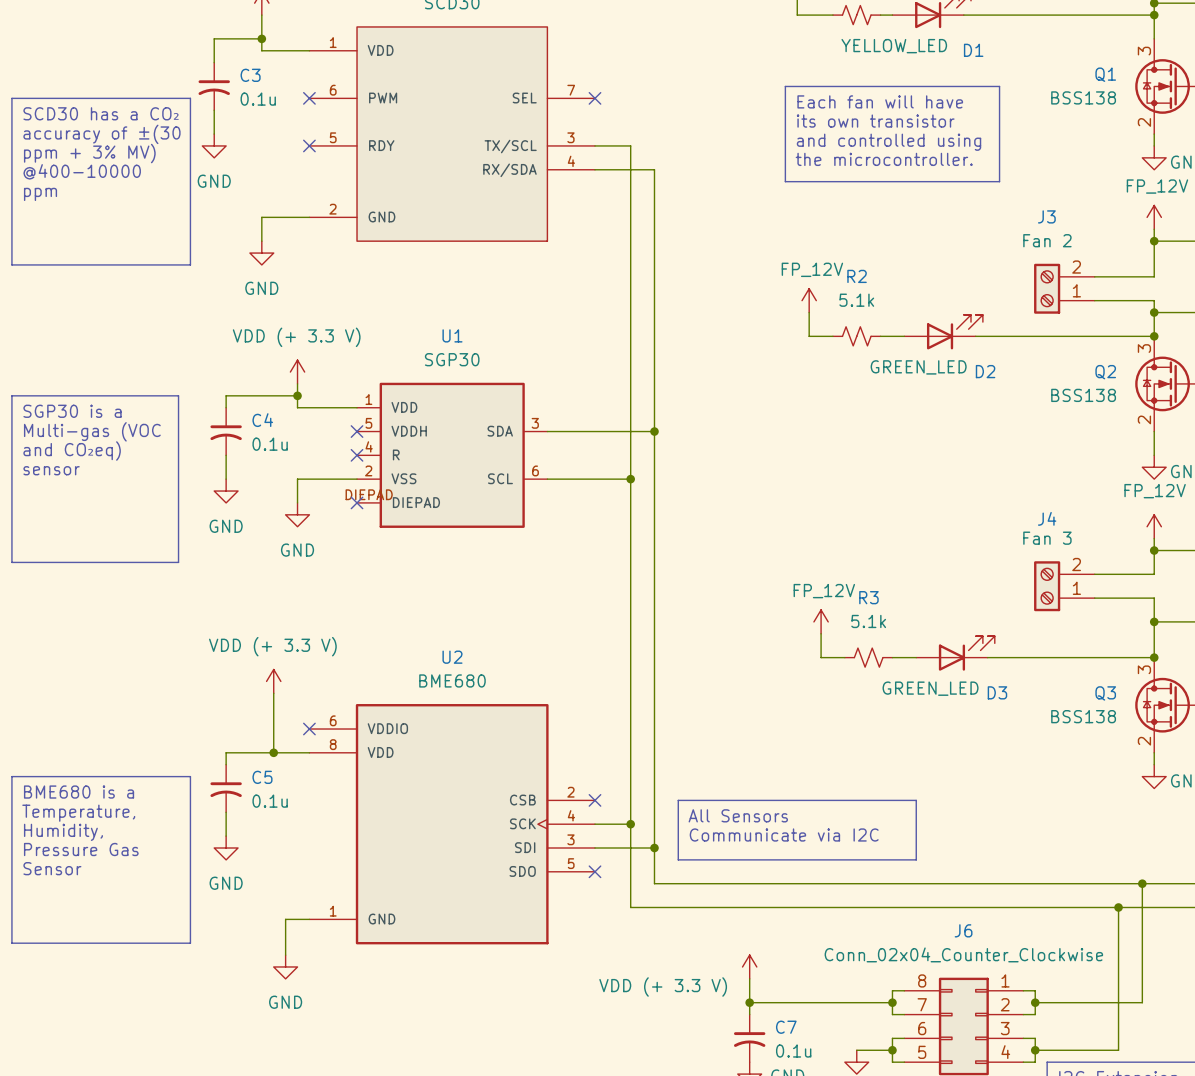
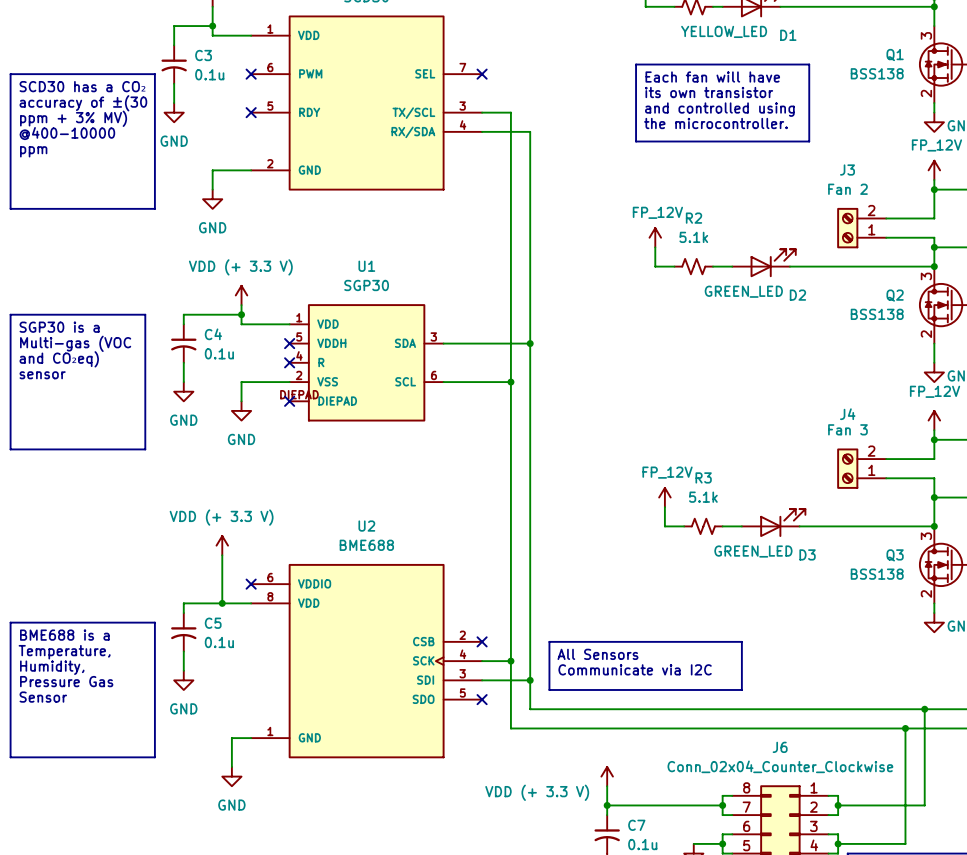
U2 value: BME680 (452, 680) -> BME688 (366, 545)
text: BME680 is a (79, 792) -> BME688 is a (64, 635)

